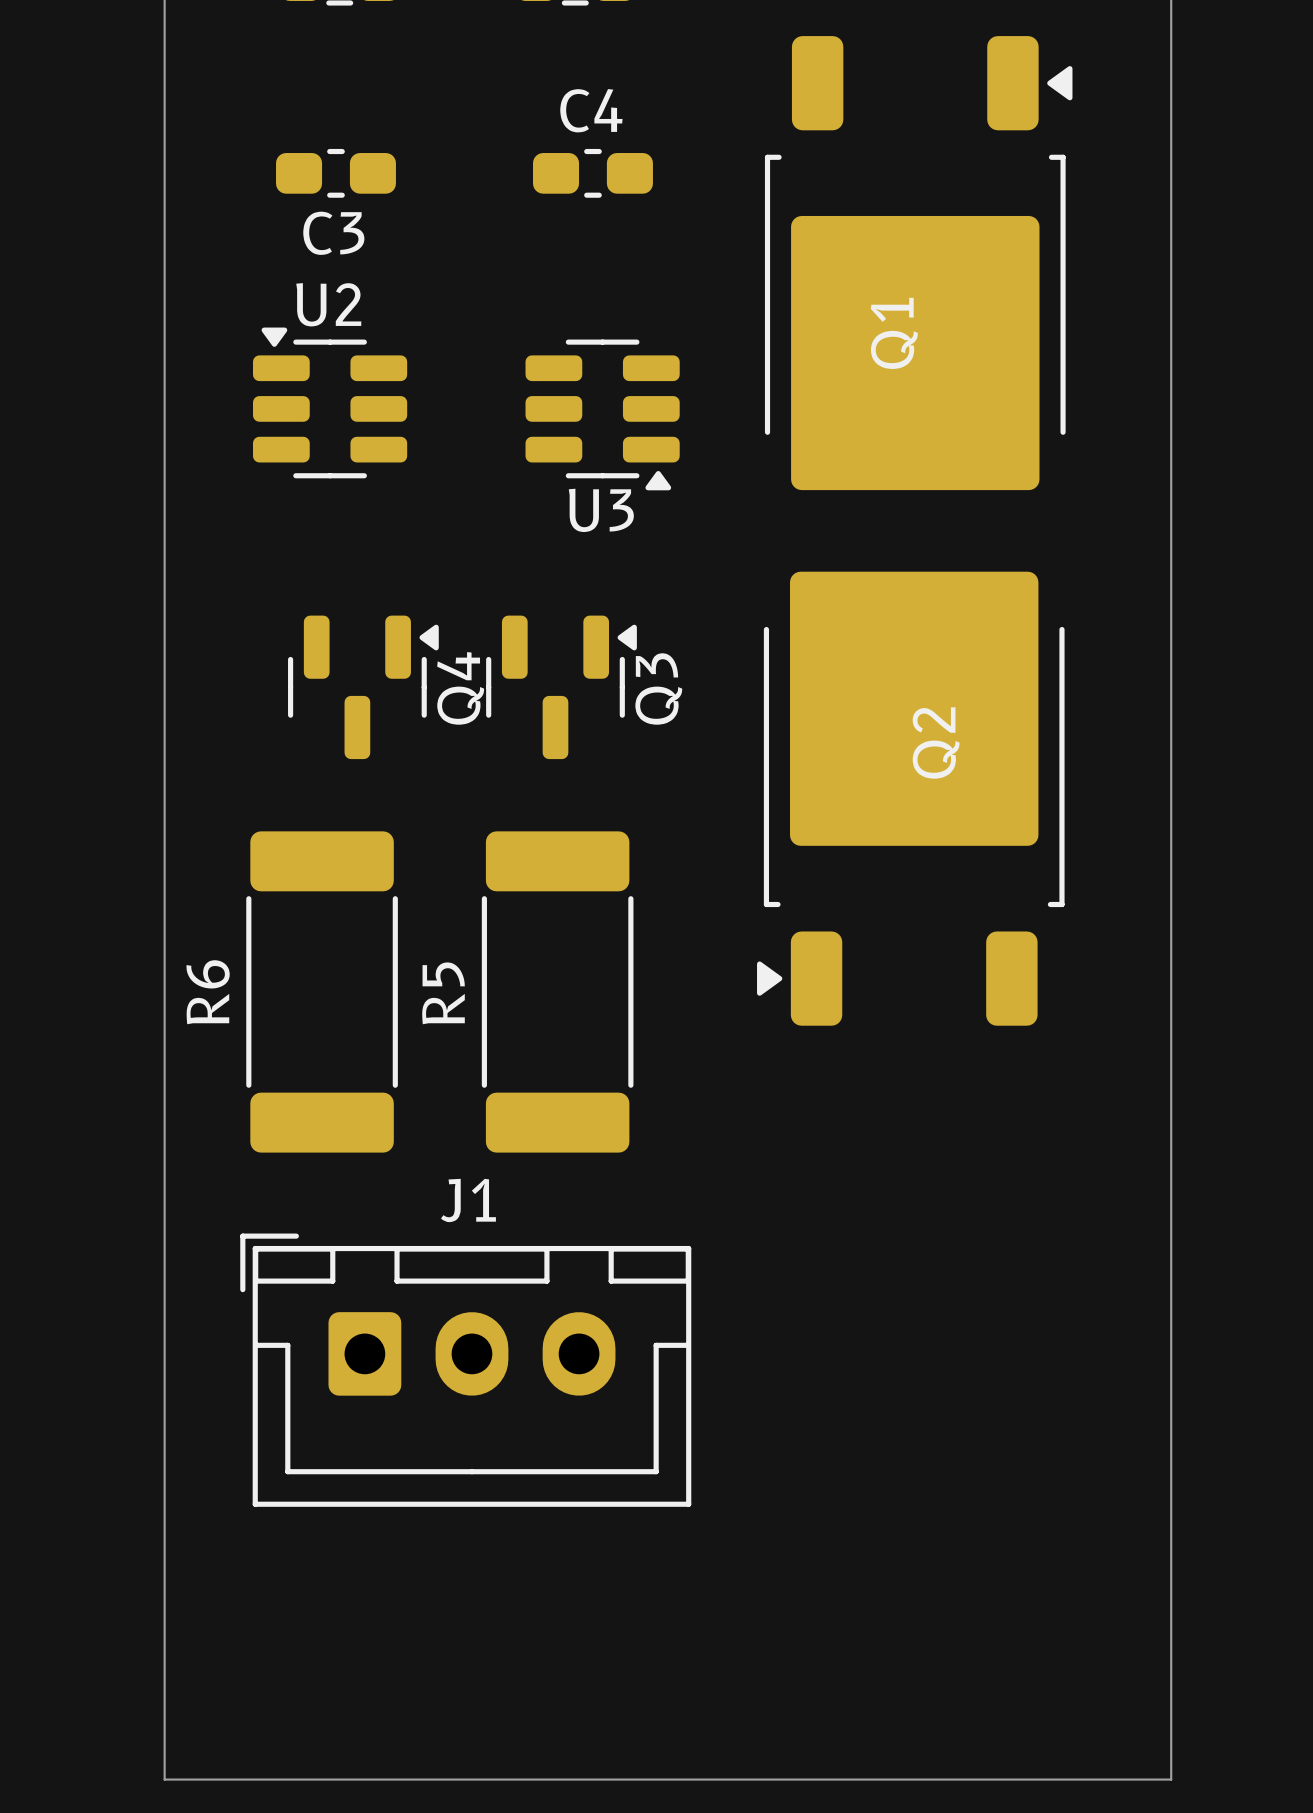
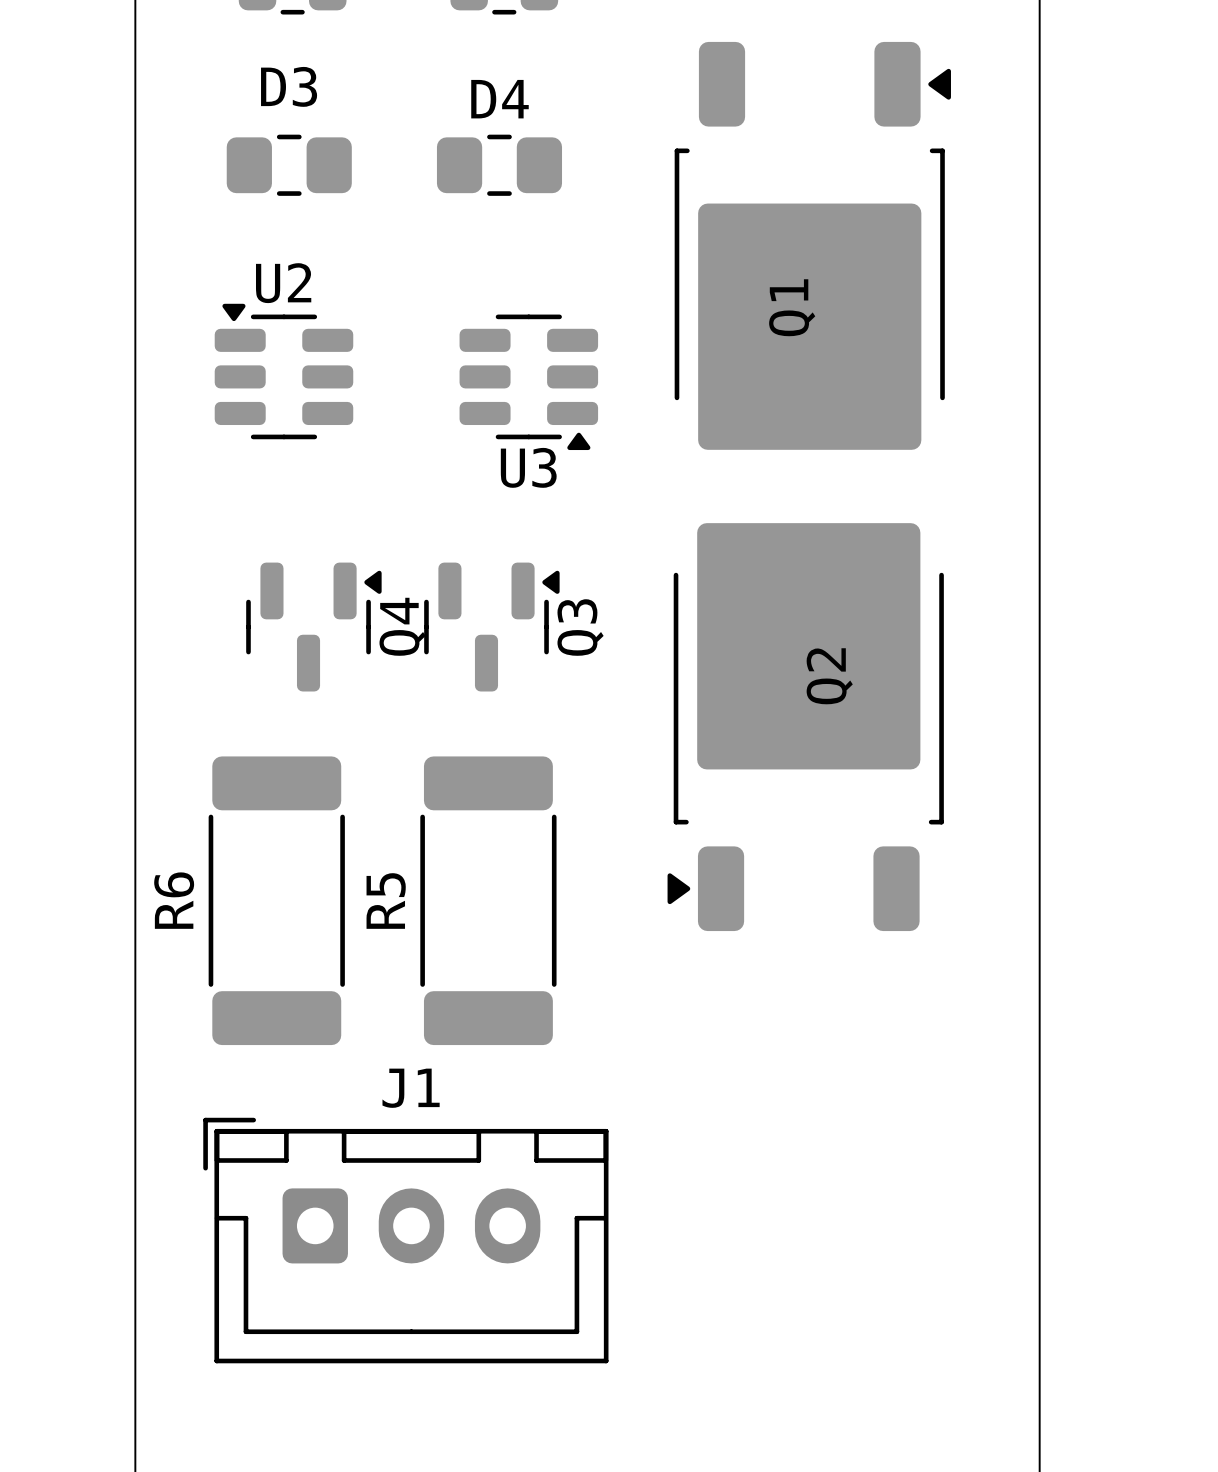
C3: (335, 173) -> none
D3: none -> (289, 165)
D4: none -> (499, 165)
C4: (592, 173) -> none

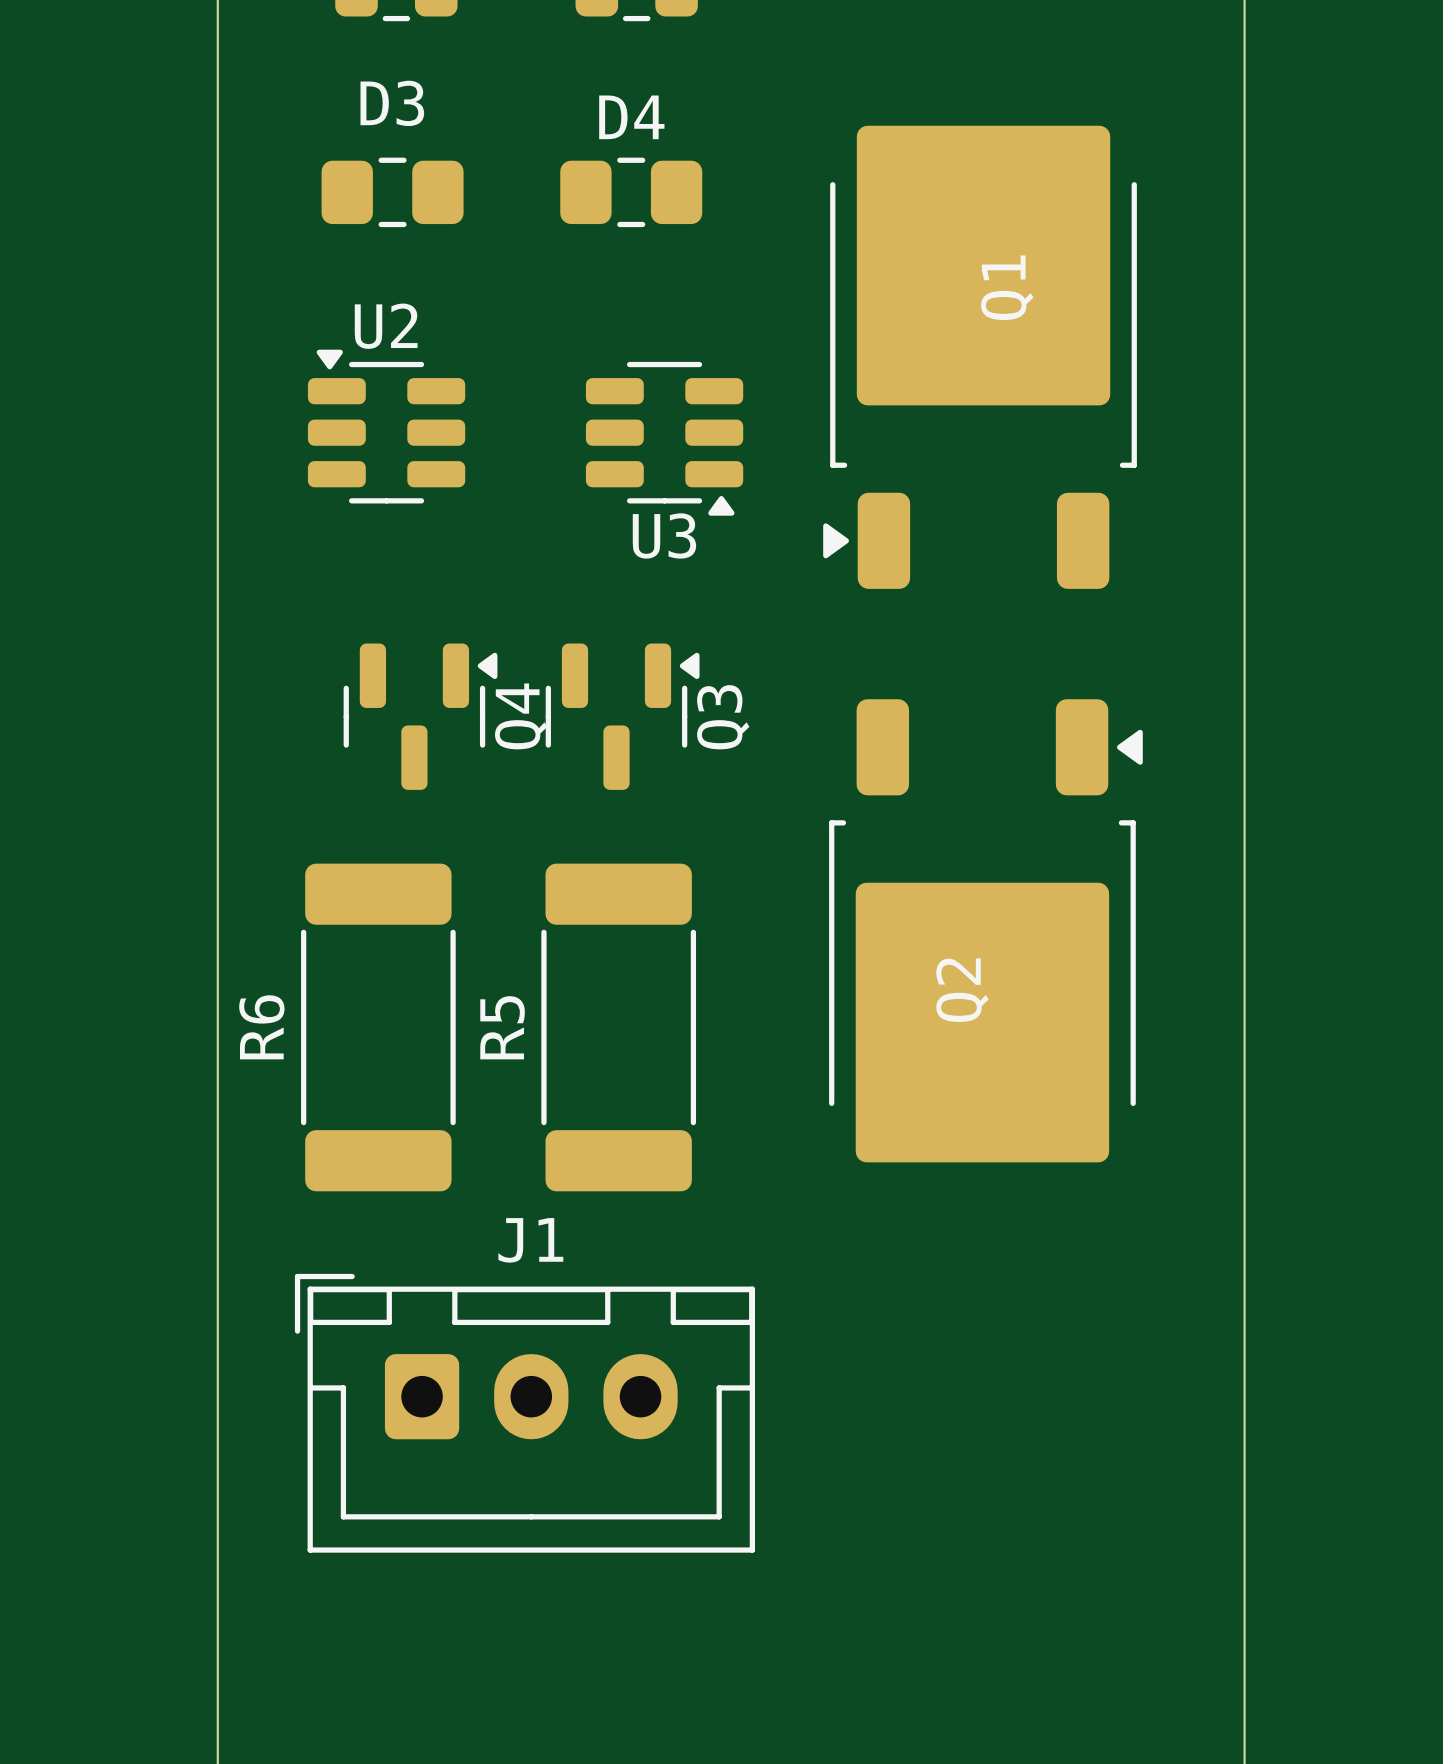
Q1 rotation: 0° (812, 245) -> 180° (980, 357)
Q2 rotation: 0° (805, 727) -> 180° (985, 930)

